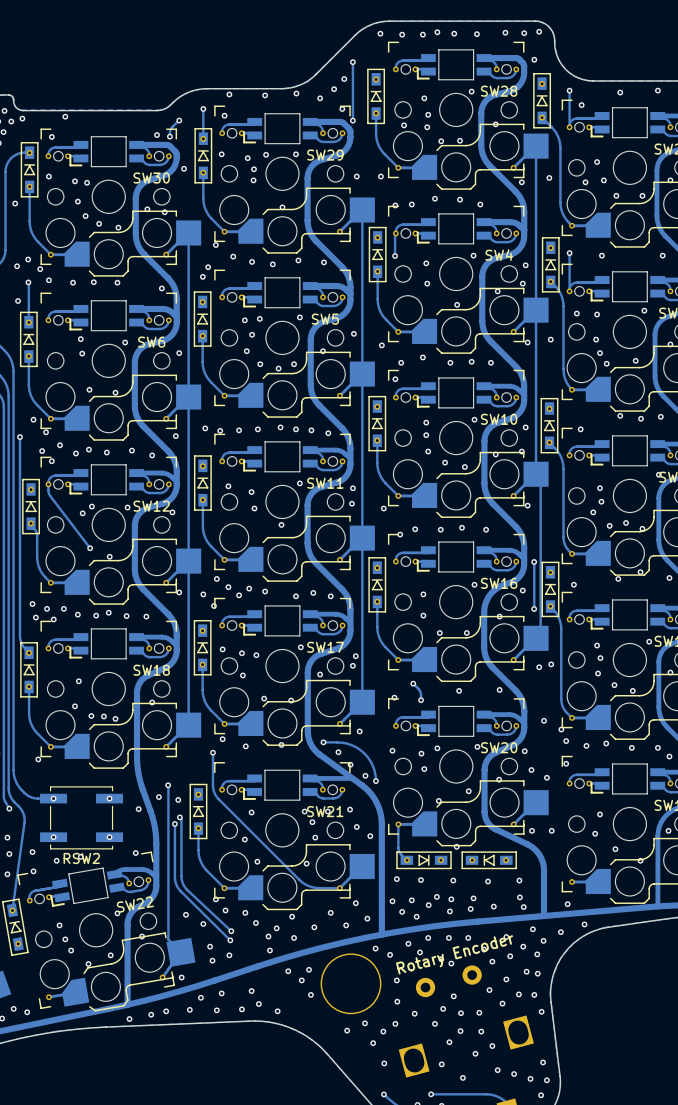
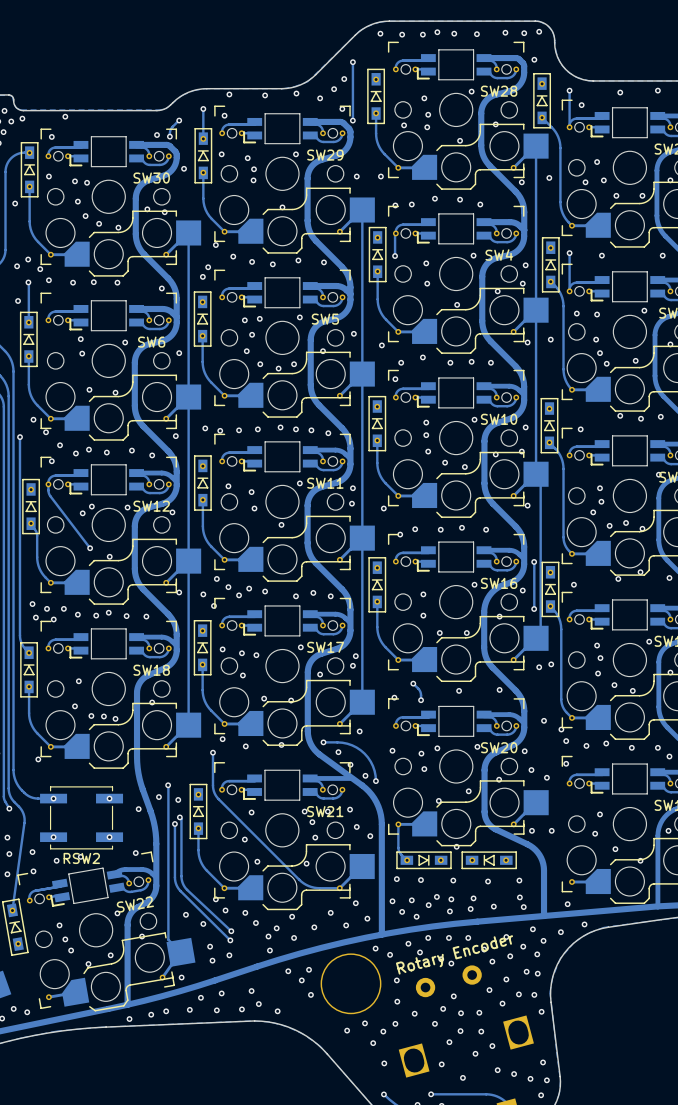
via: (441, 141) -> none
via: (266, 154) -> none
via: (42, 451) -> none

